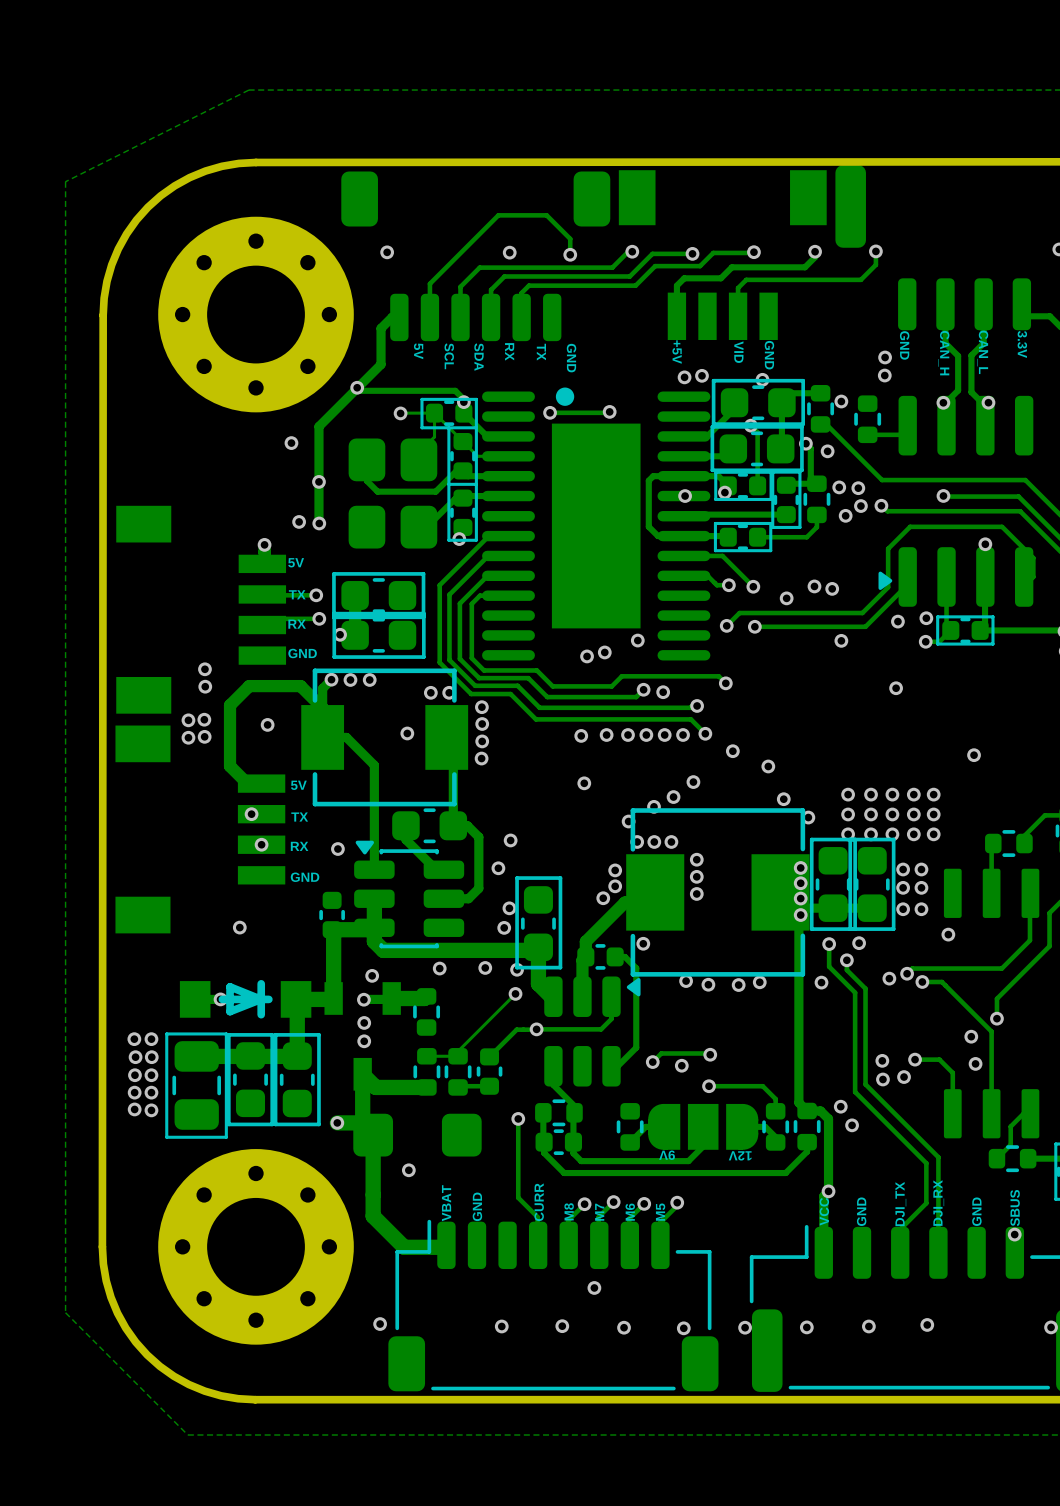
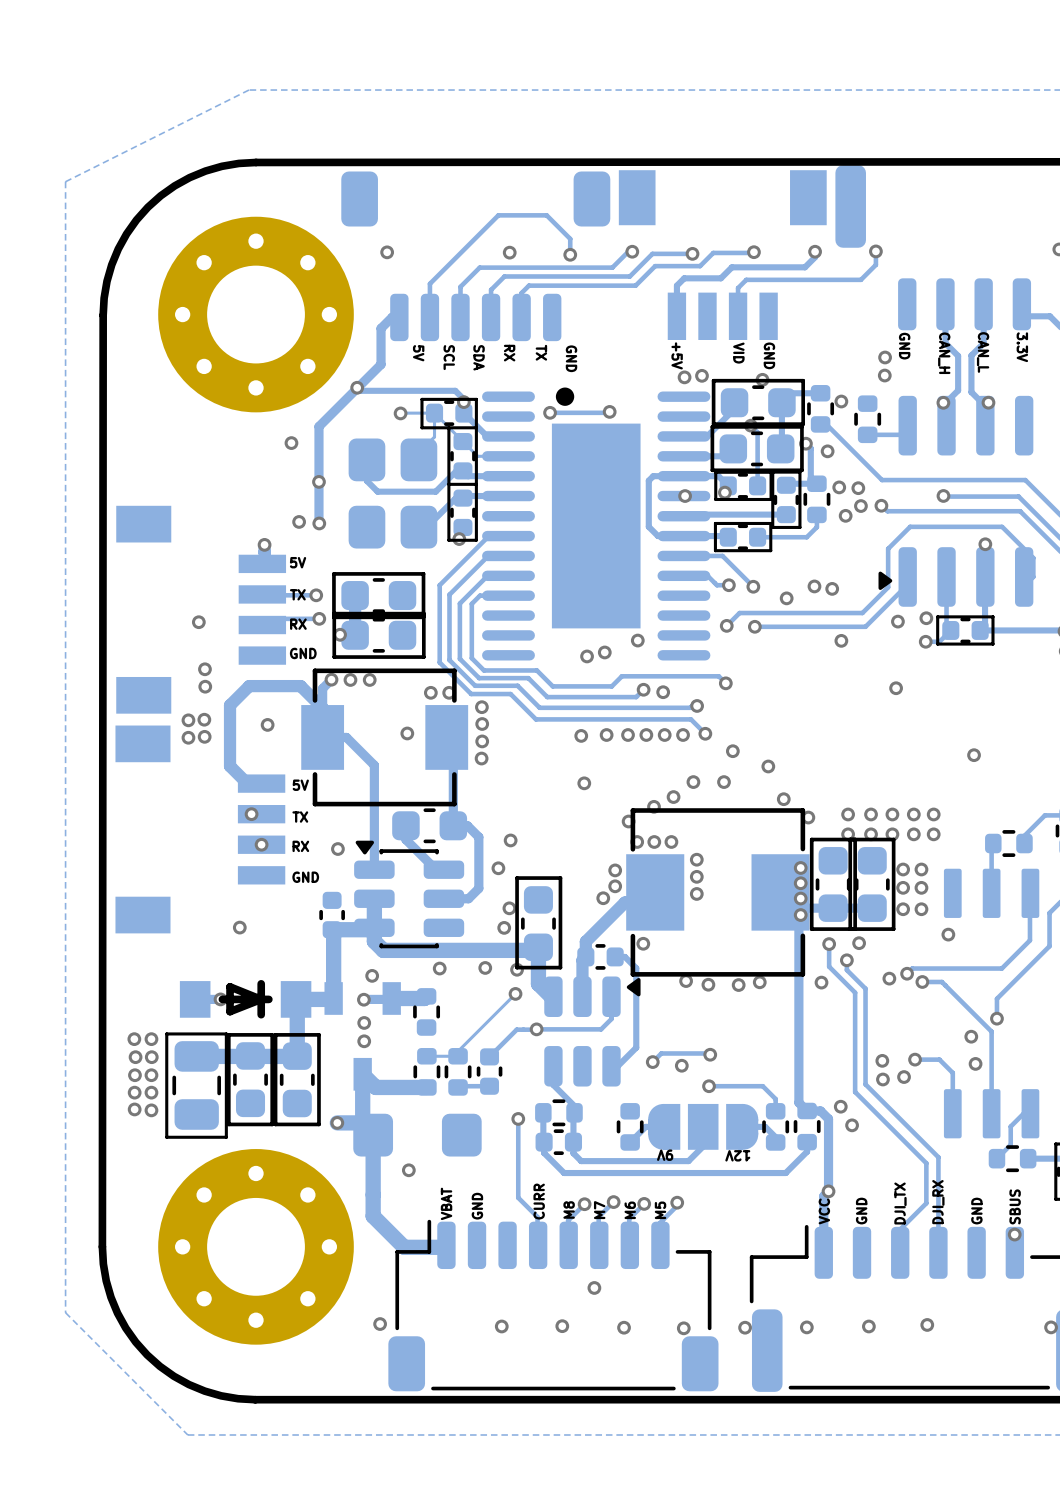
via: none -> (198, 622)
via: none -> (723, 782)
via: (848, 794) -> none
via: (871, 794) -> none
via: (892, 794) -> none
via: (913, 794) -> none
via: (933, 794) -> none

